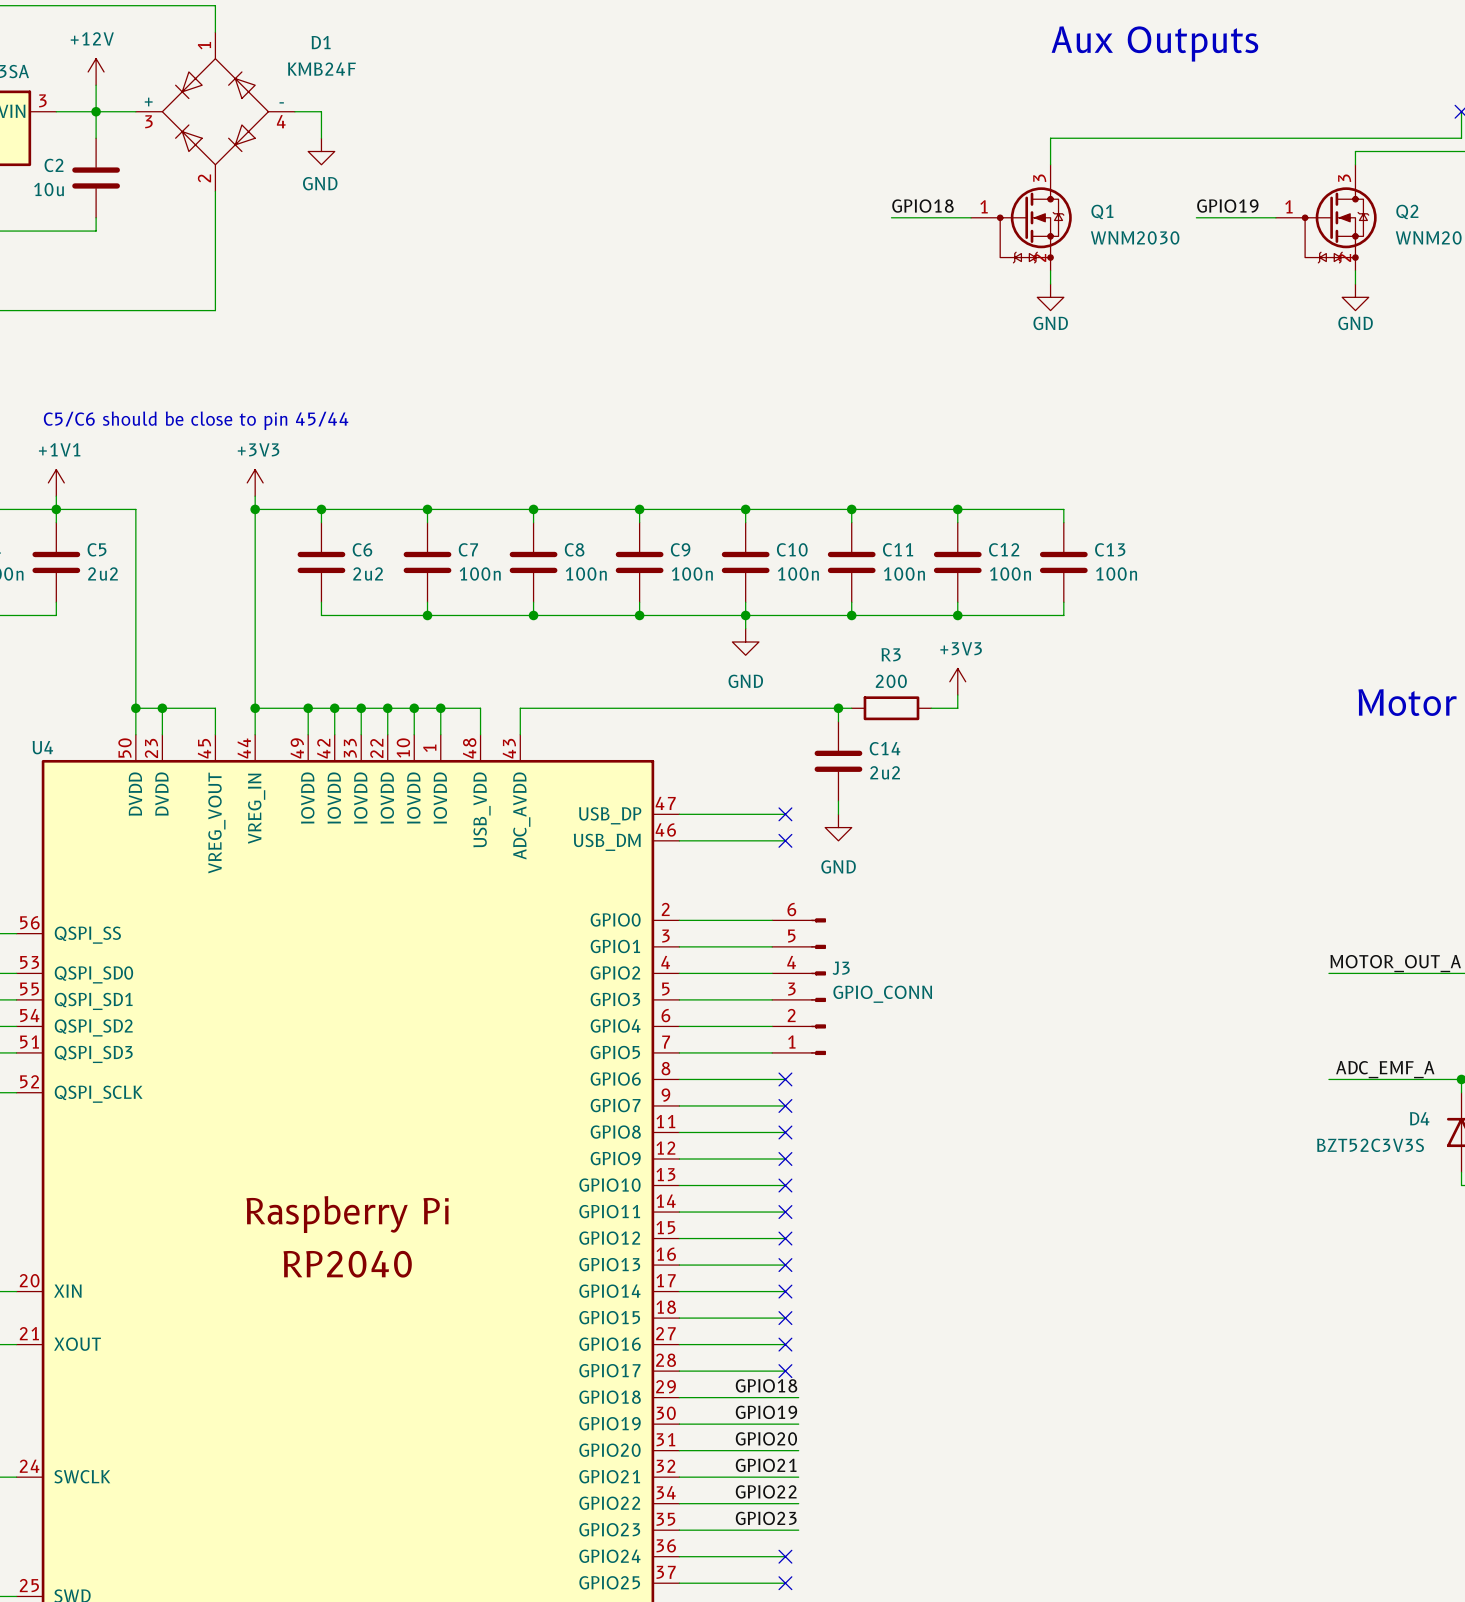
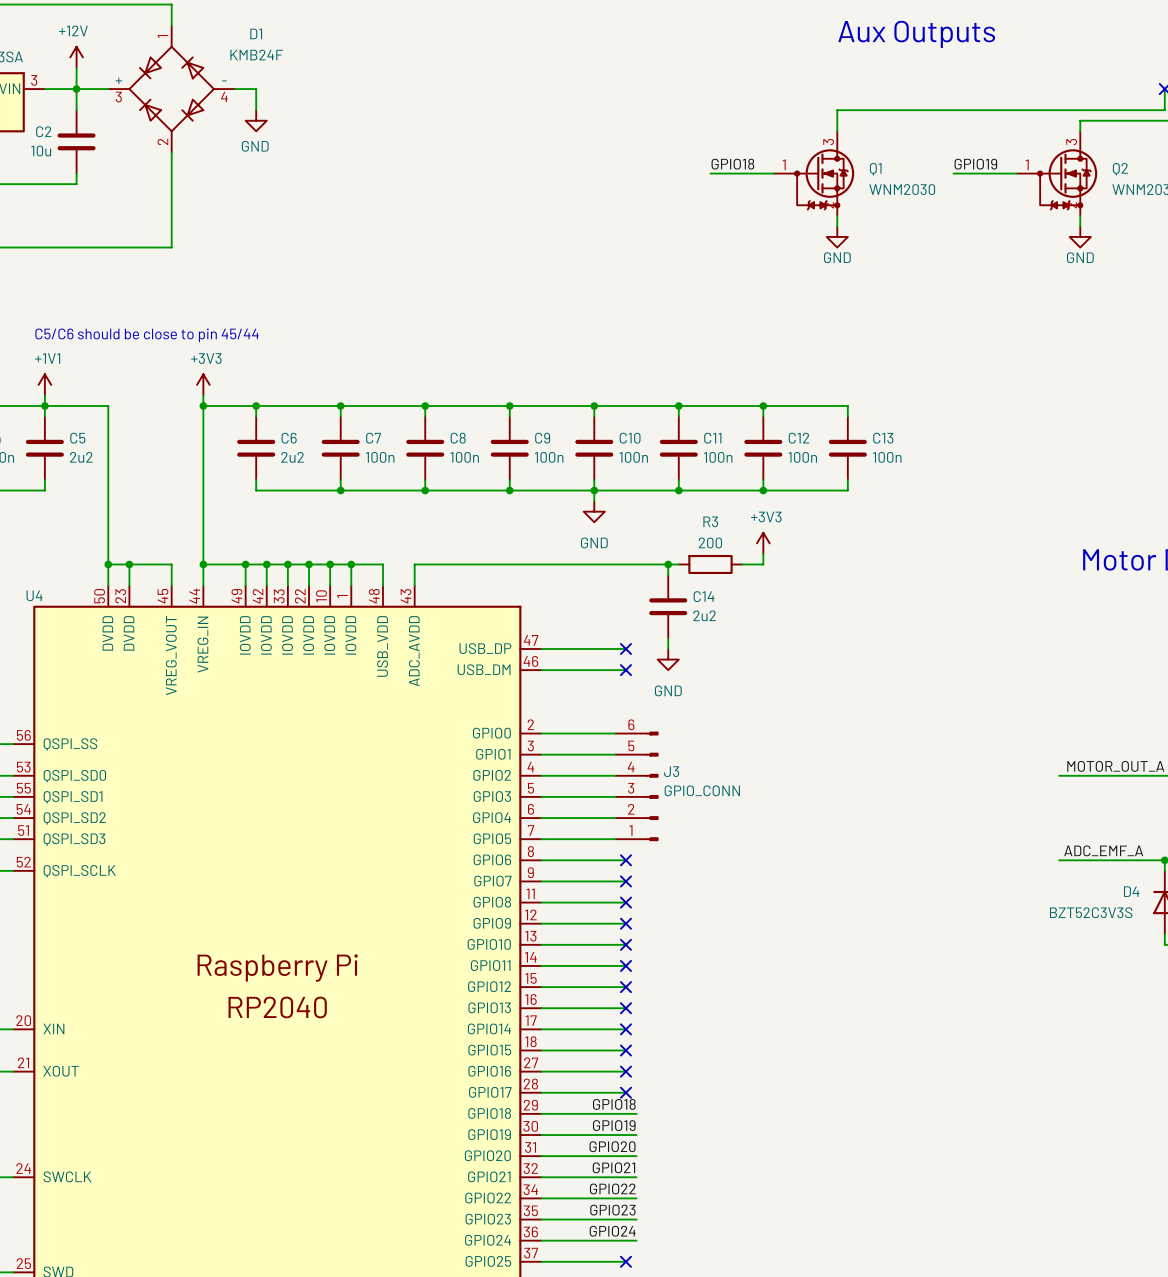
label: none -> GPIO24 (612, 1231)
wire: none -> (625, 1240) (636, 1240)
no-connect mark: (785, 1556) -> none

